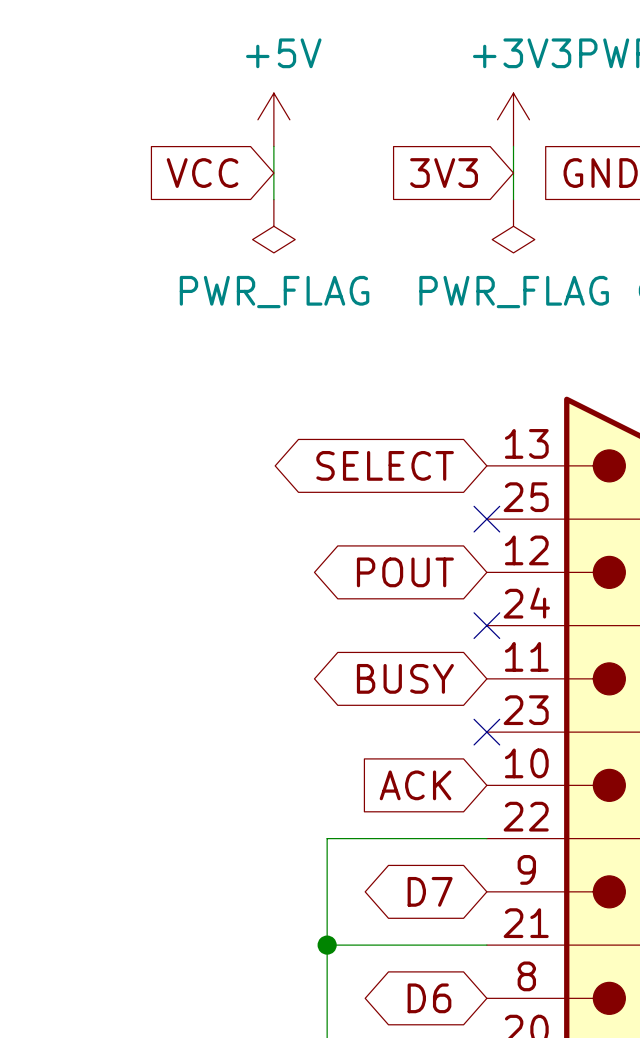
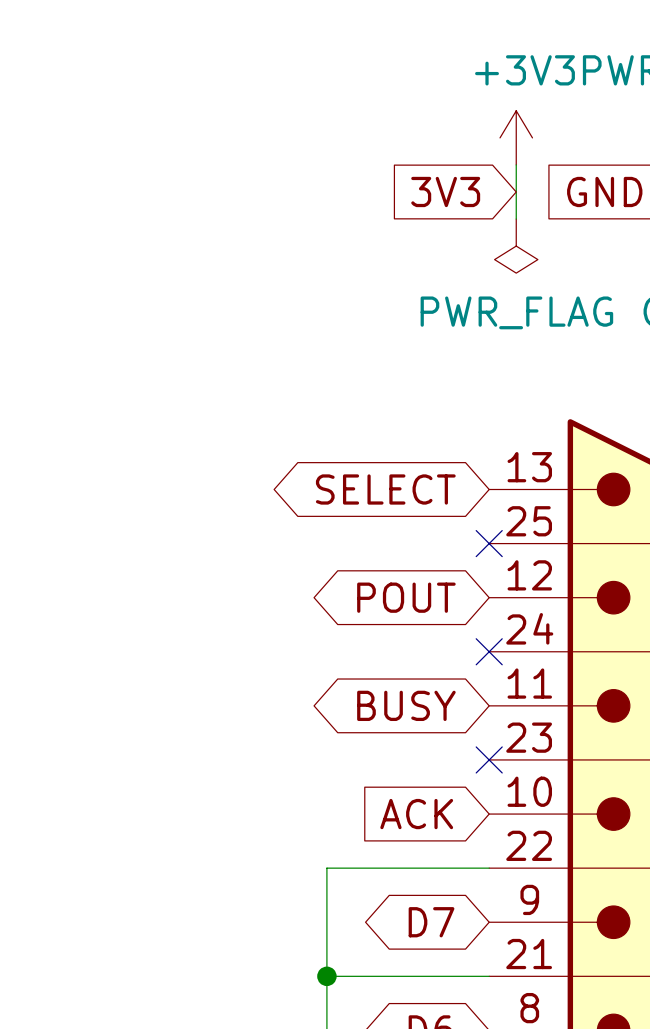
power symbol: +5V (273, 119) -> none
wire: (273, 146) (273, 199) -> none
global label: VCC (202, 173) -> none
power symbol: PWR_FLAG (273, 226) -> none

